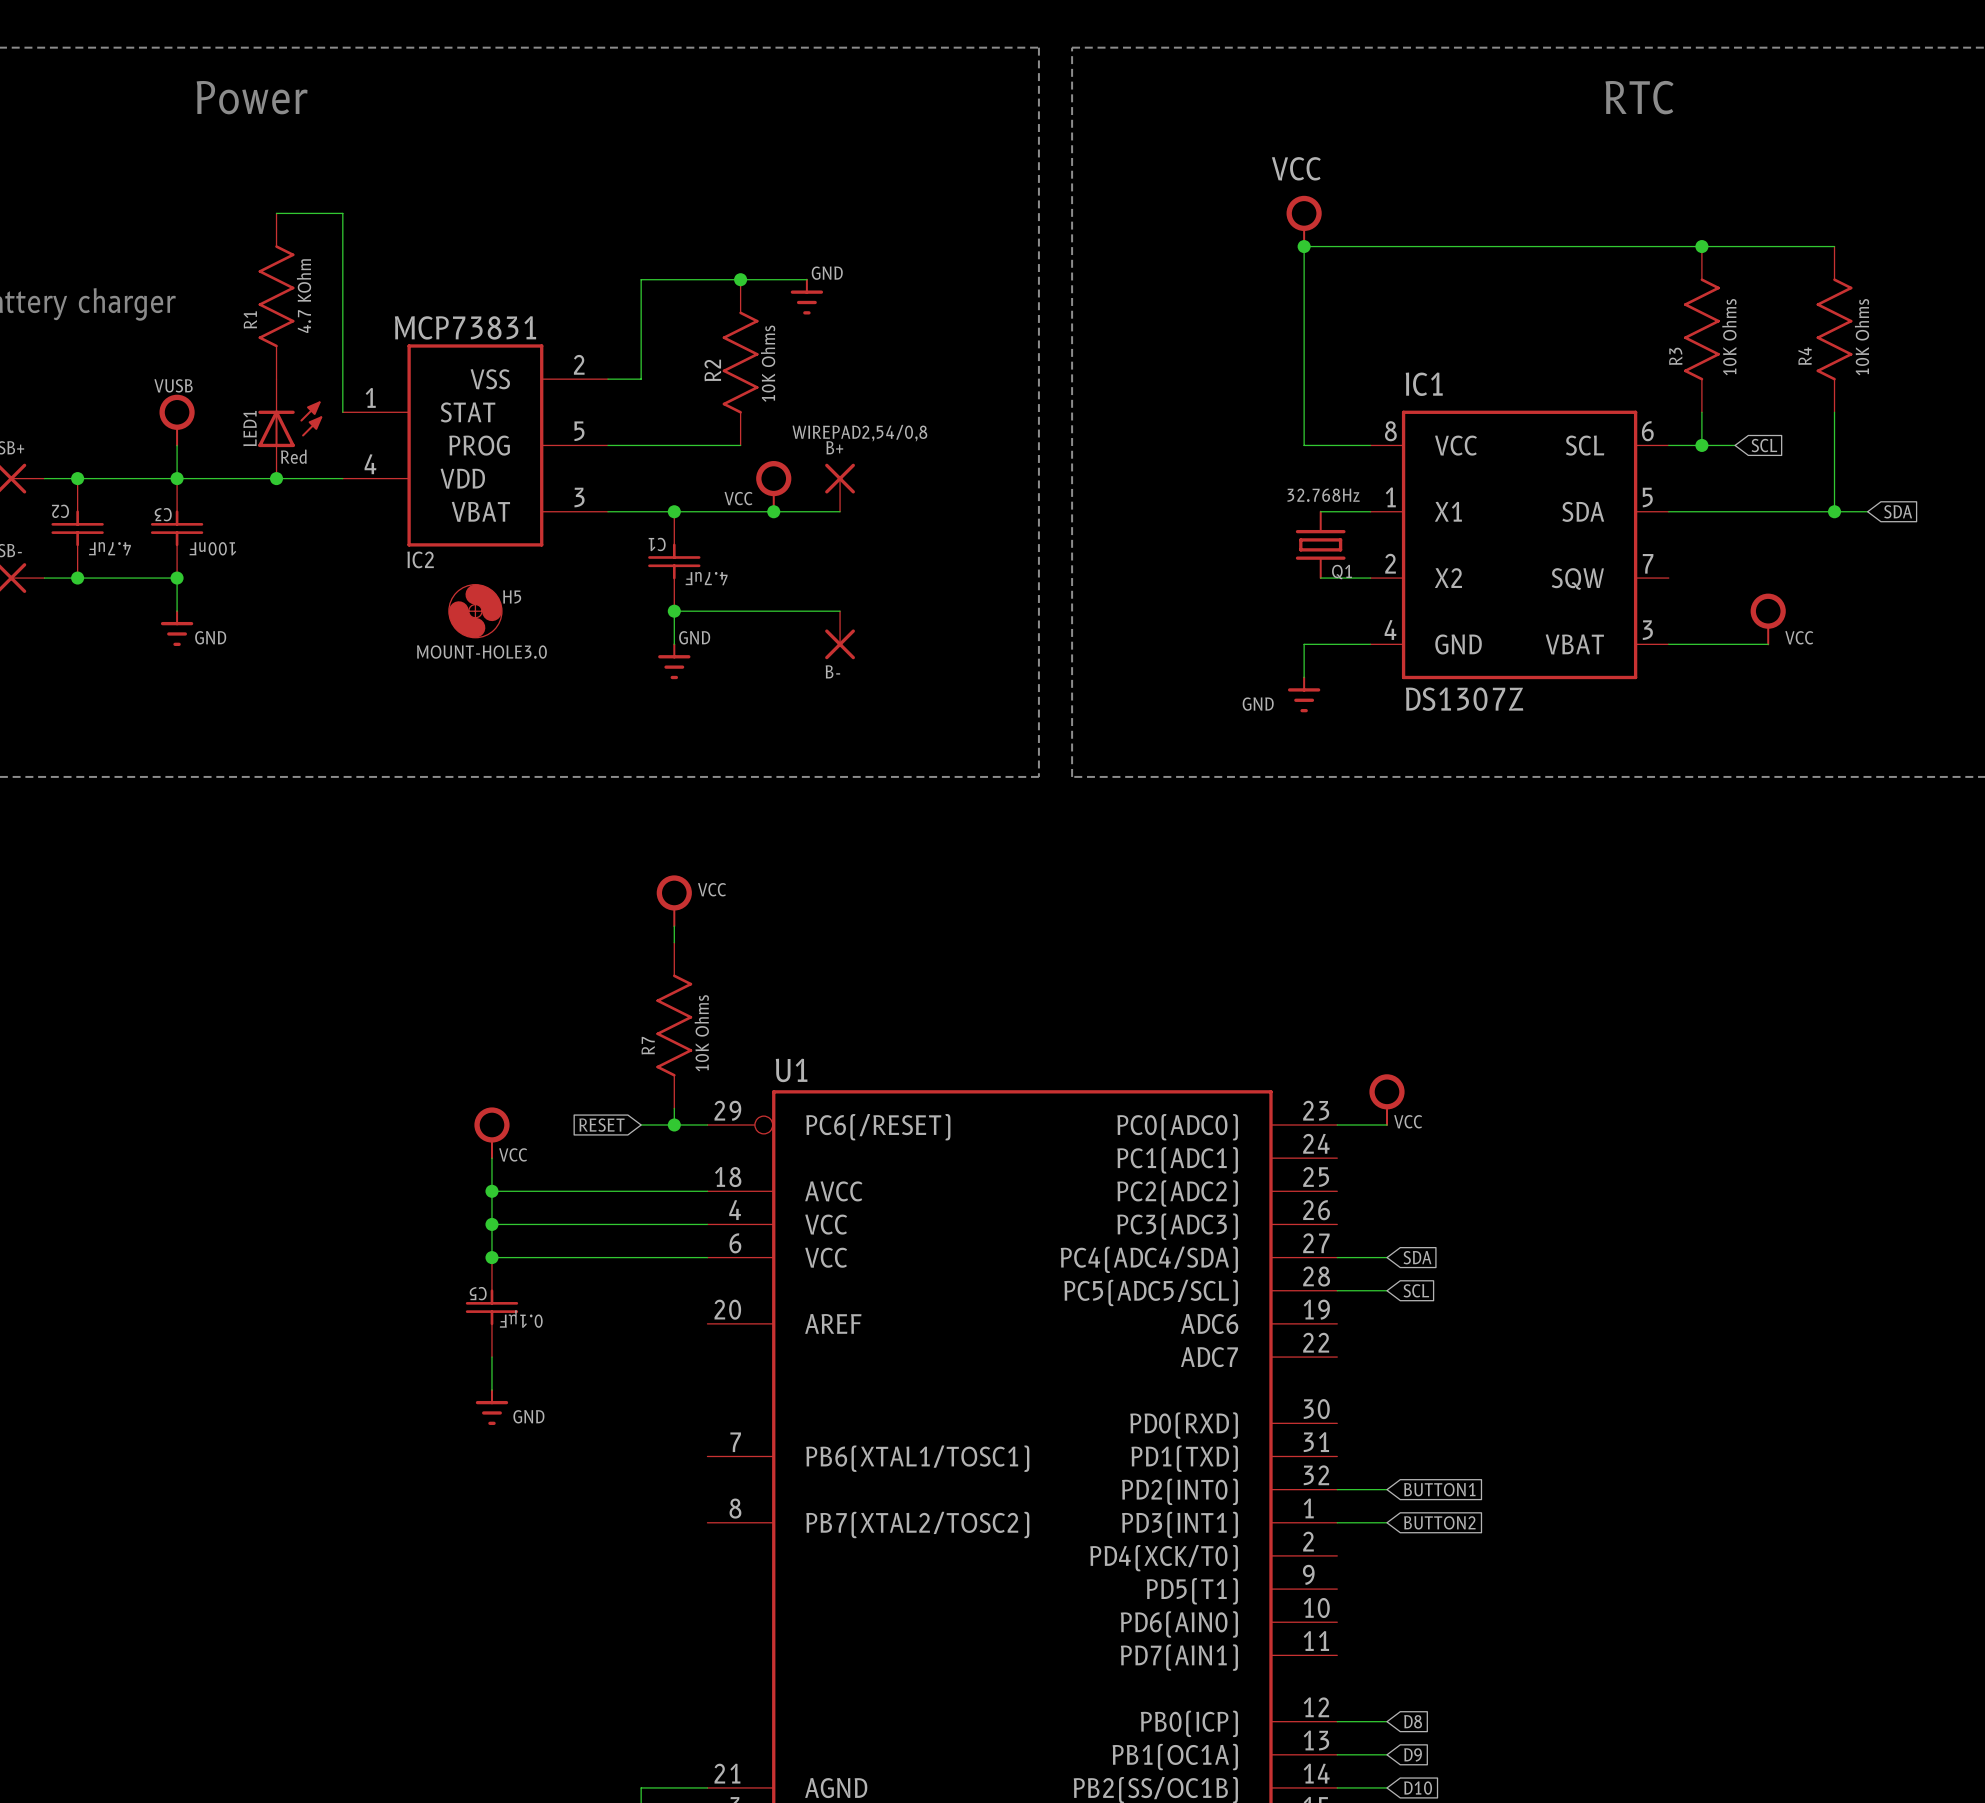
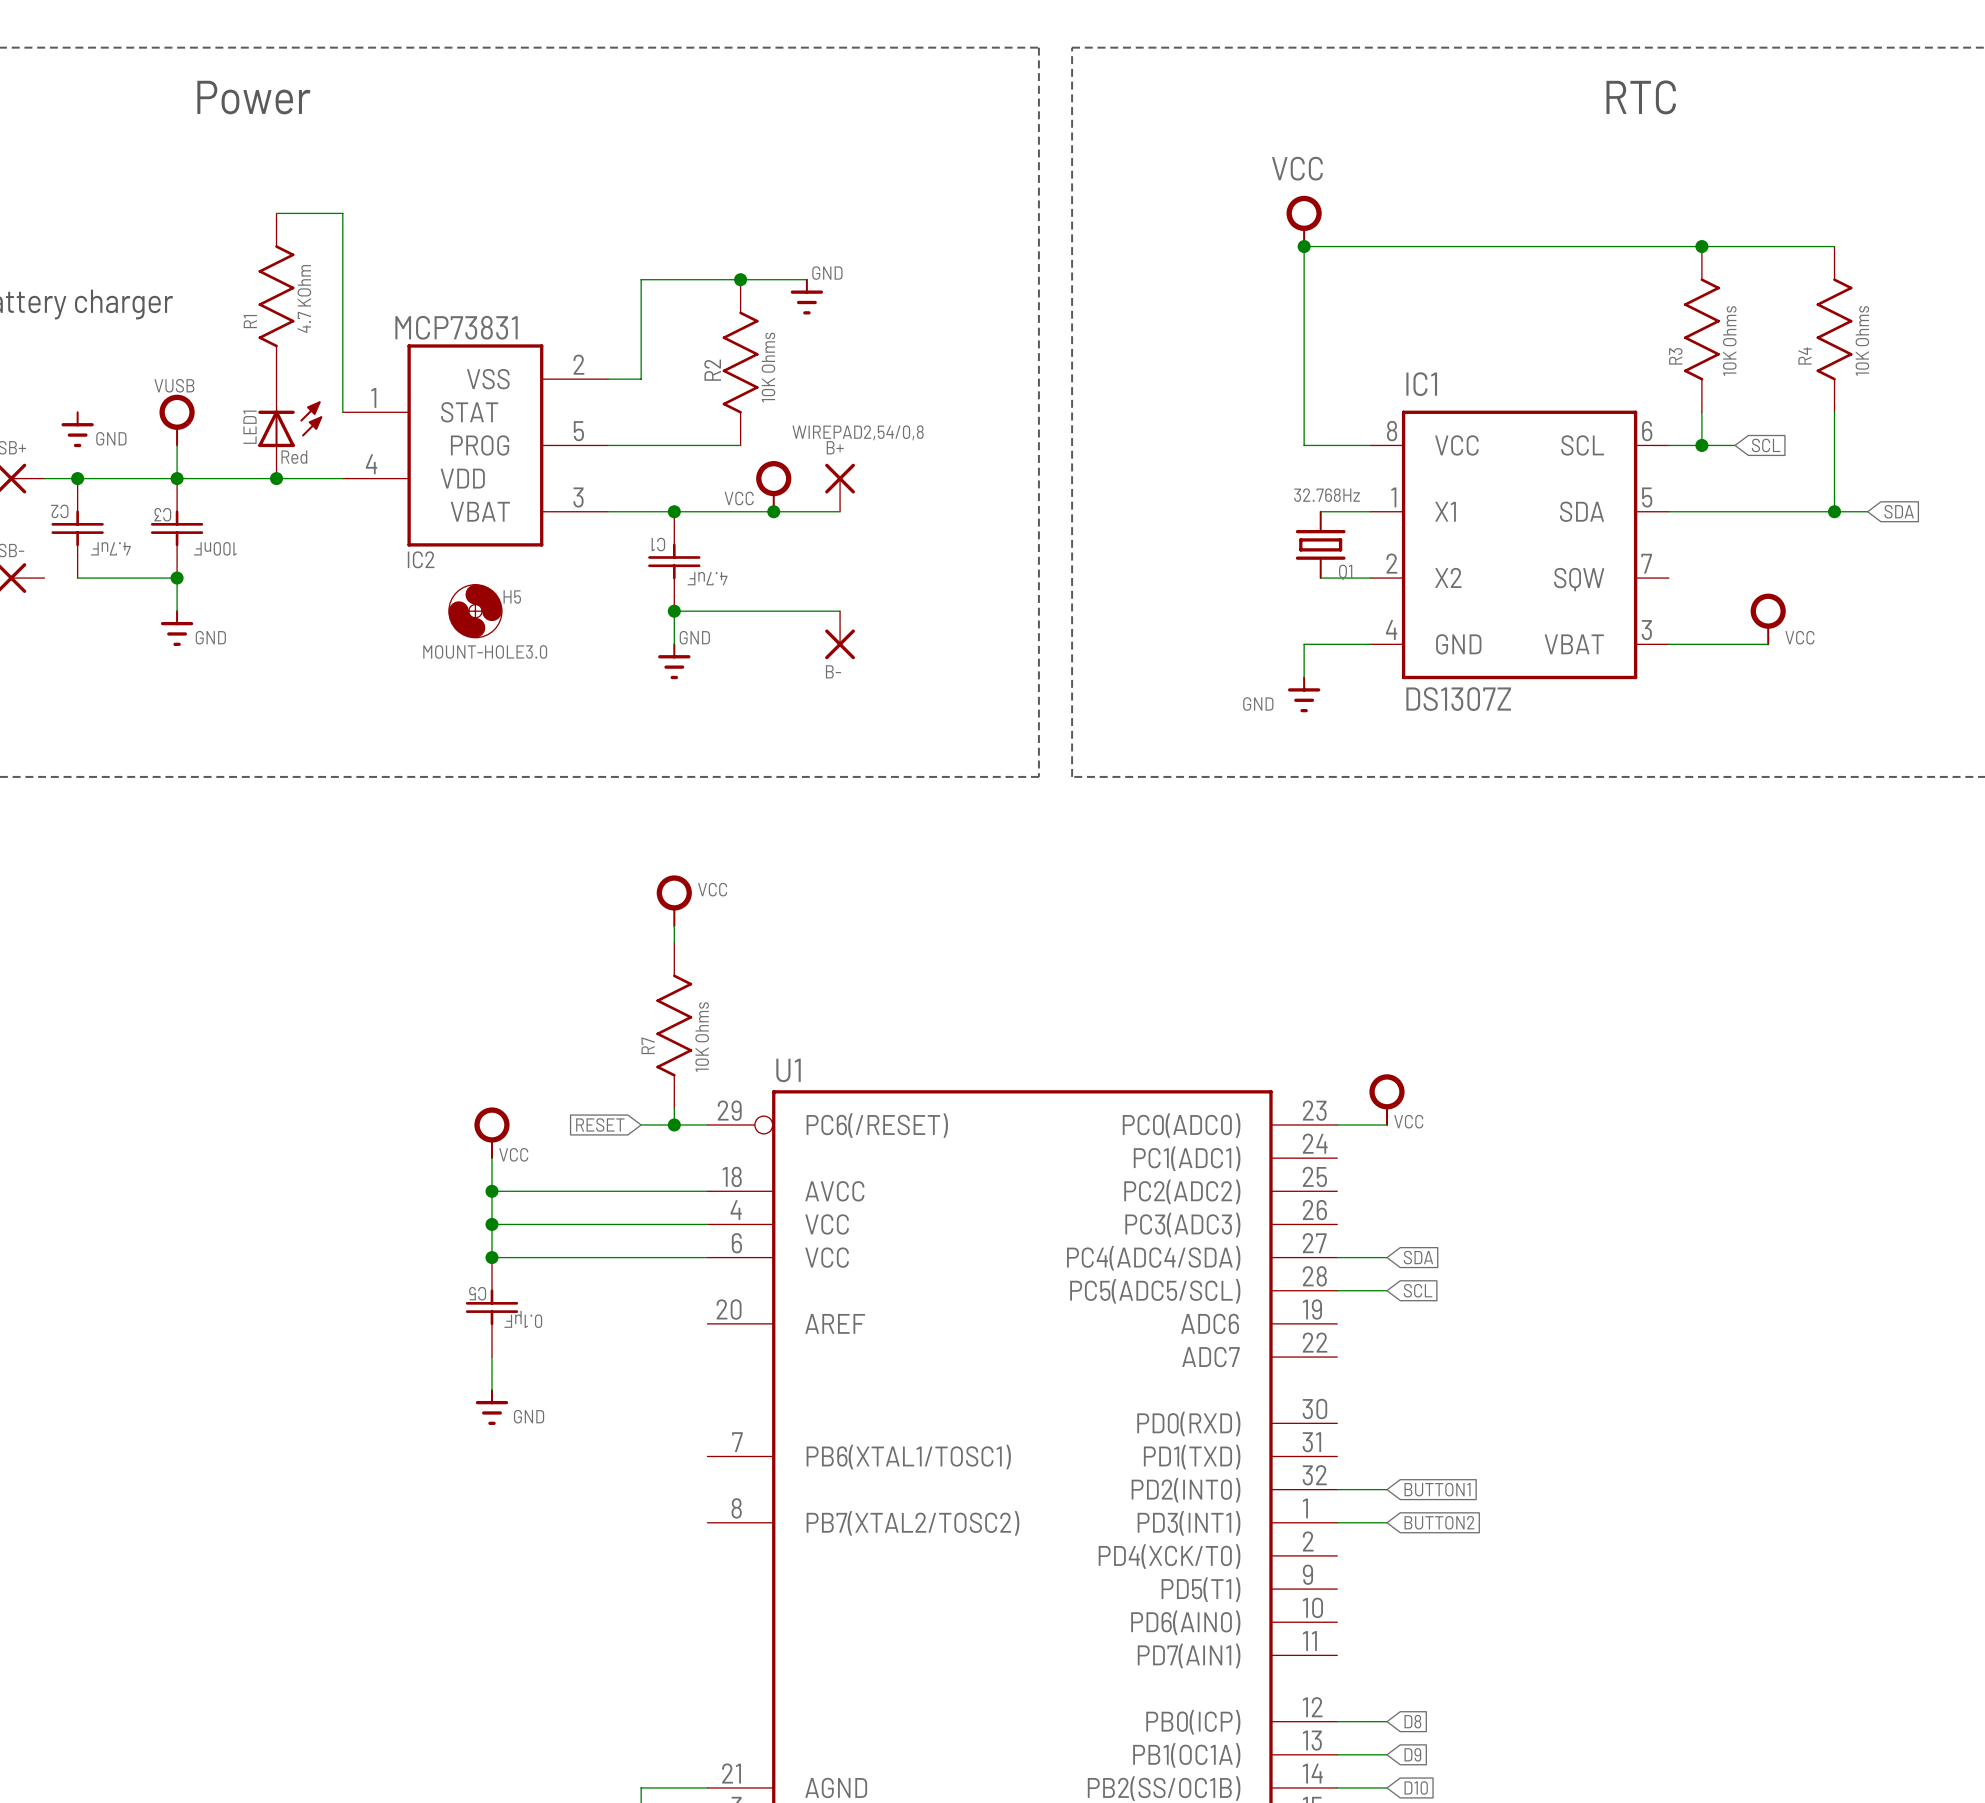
power symbol: none -> GND (77, 429)
wire: (44, 578) (77, 578) -> none
junction: (77, 578) -> none

